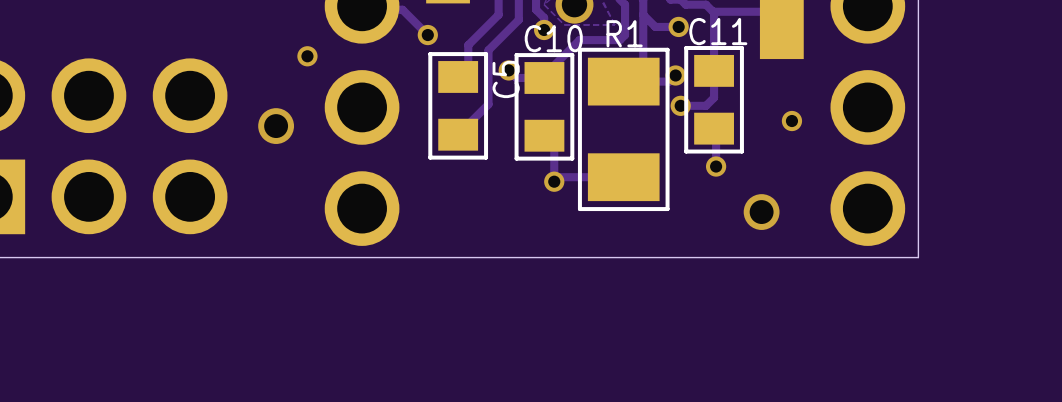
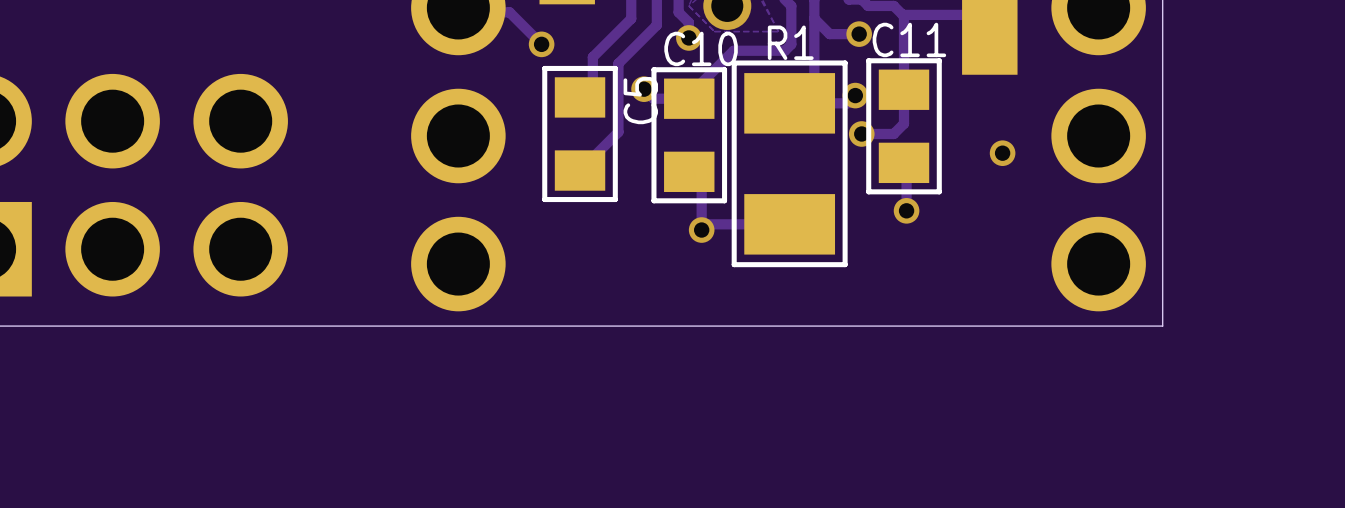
via: (307, 56) -> none
via: (276, 126) -> none
via: (761, 212) -> none

